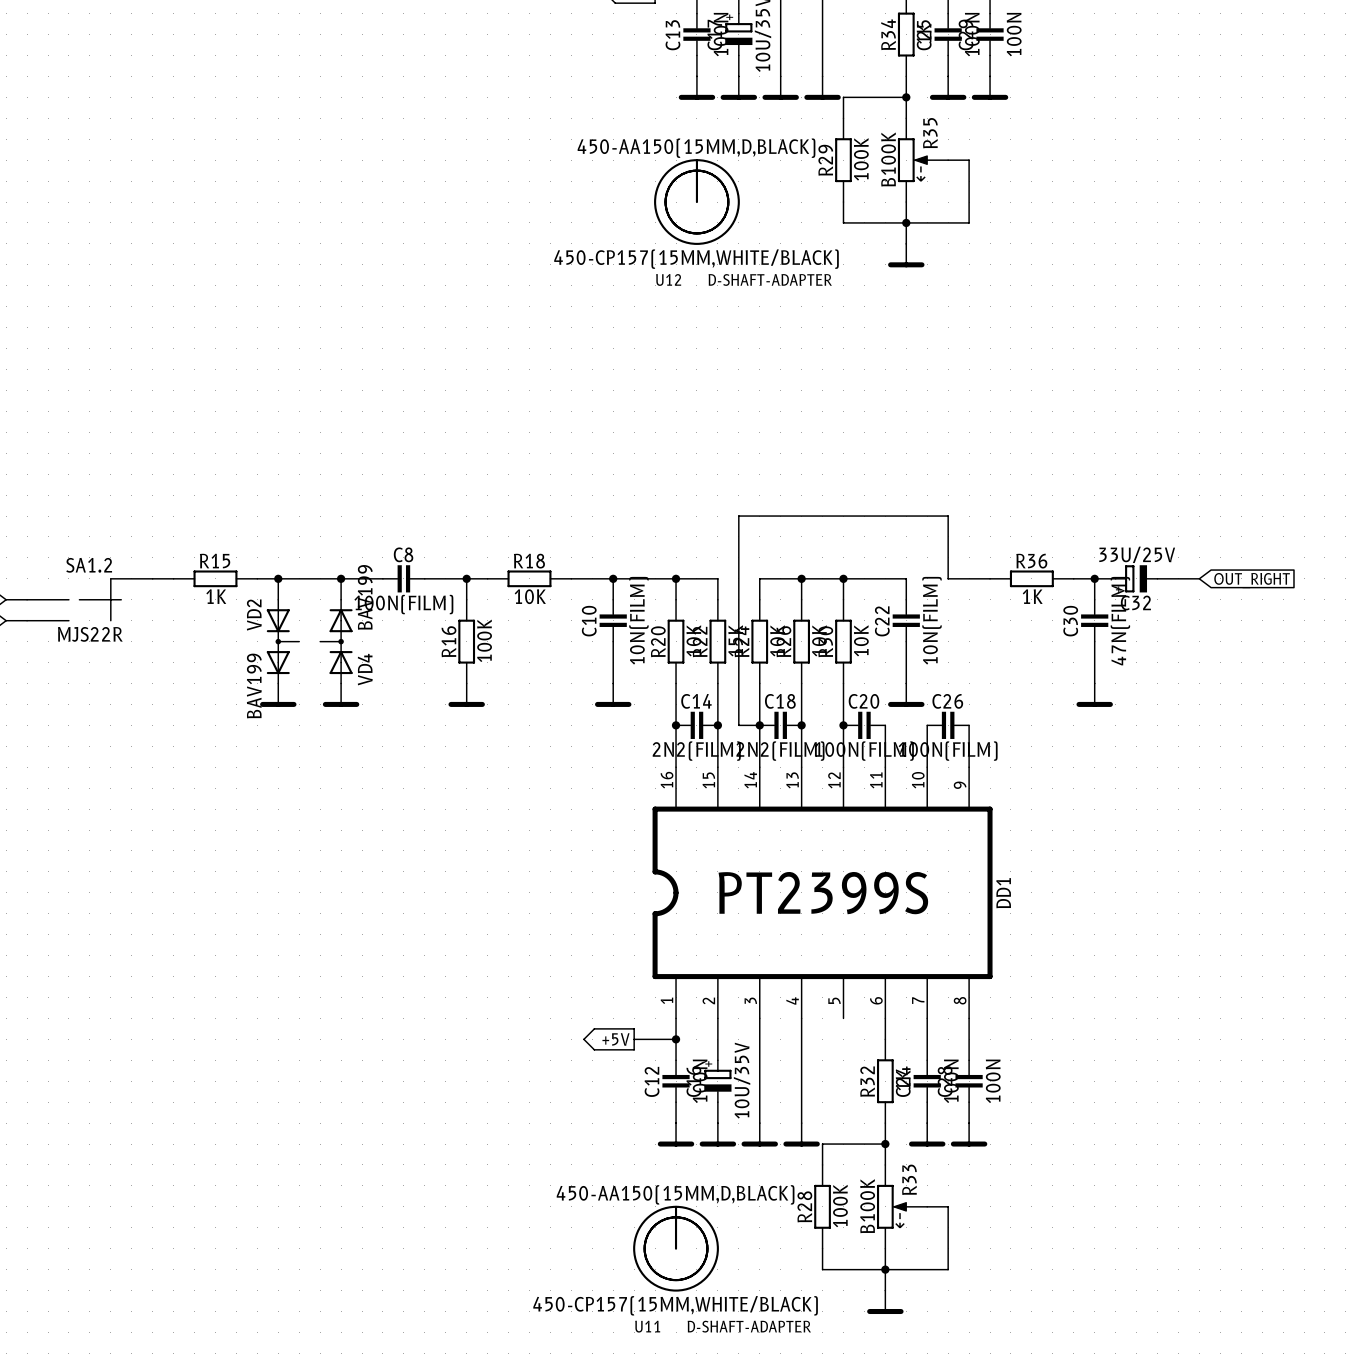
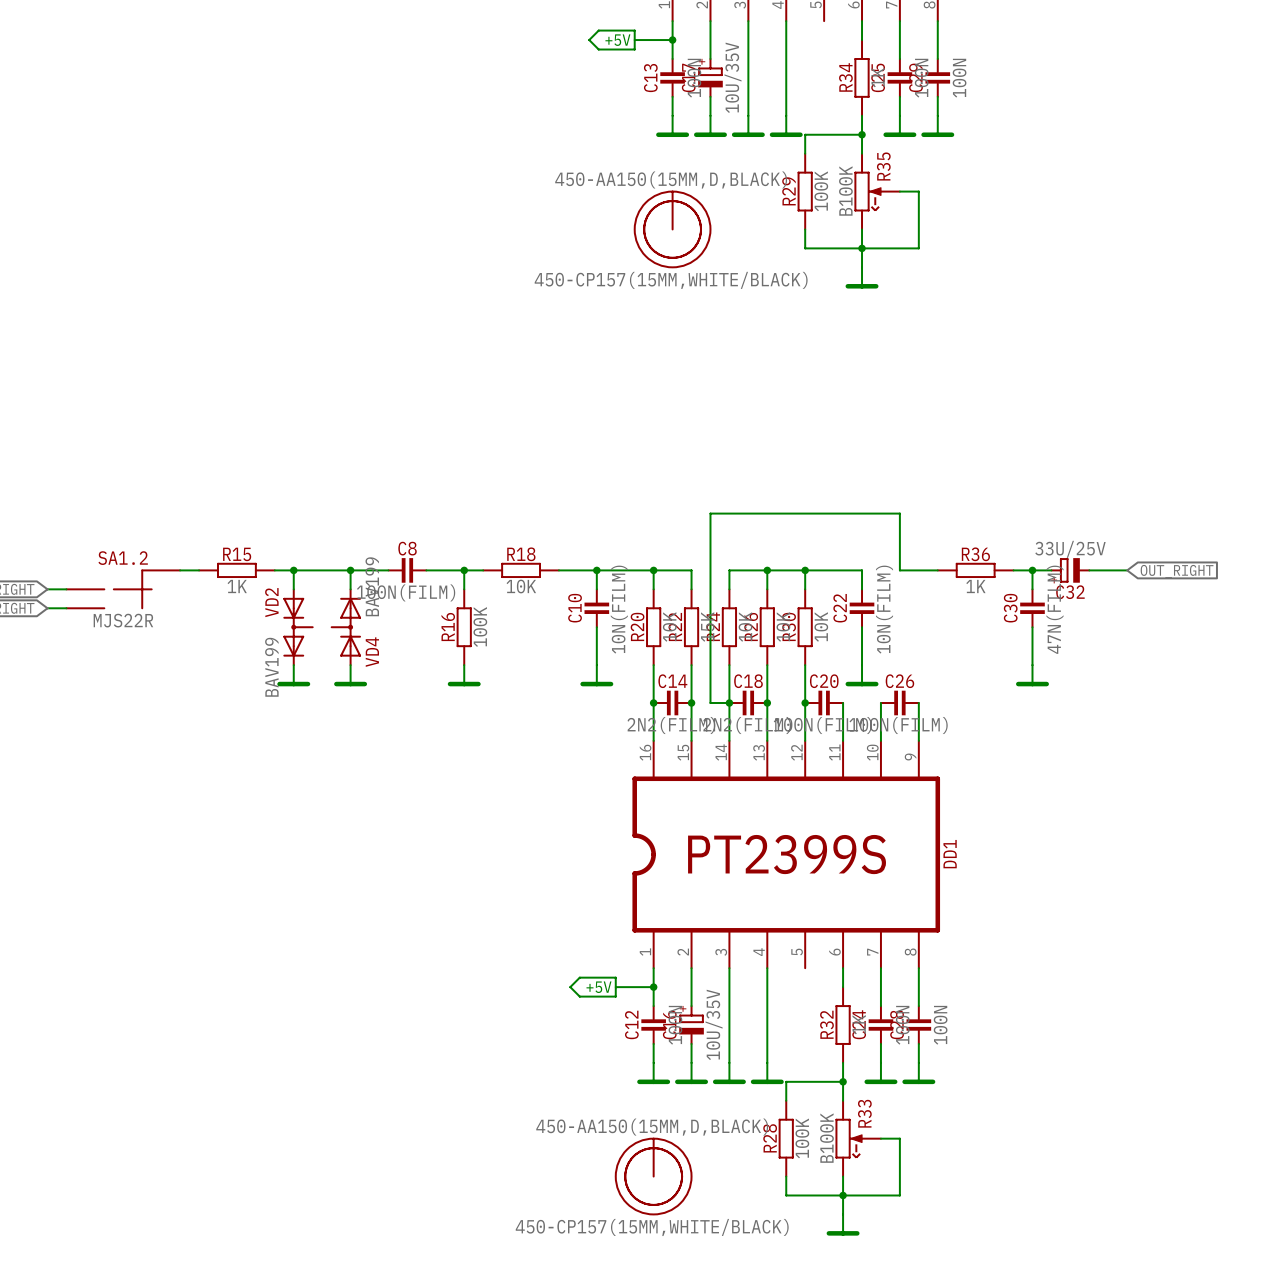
U12: D-SHAFT-ADAPTER (744, 279) -> none
U11: D-SHAFT-ADAPTER (723, 1326) -> none

